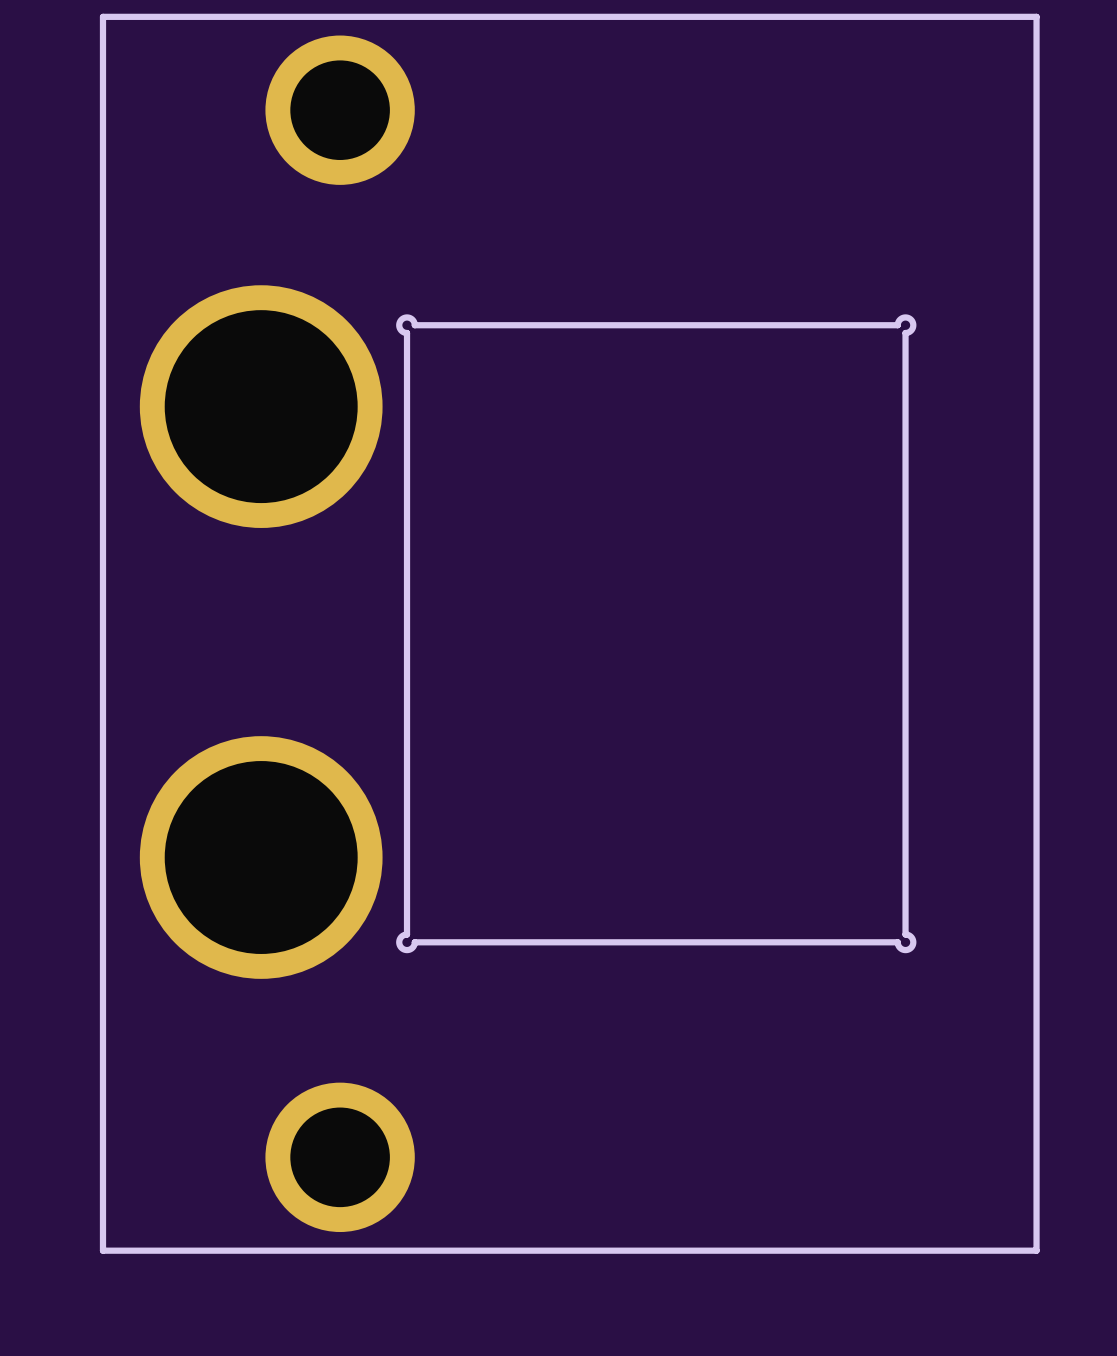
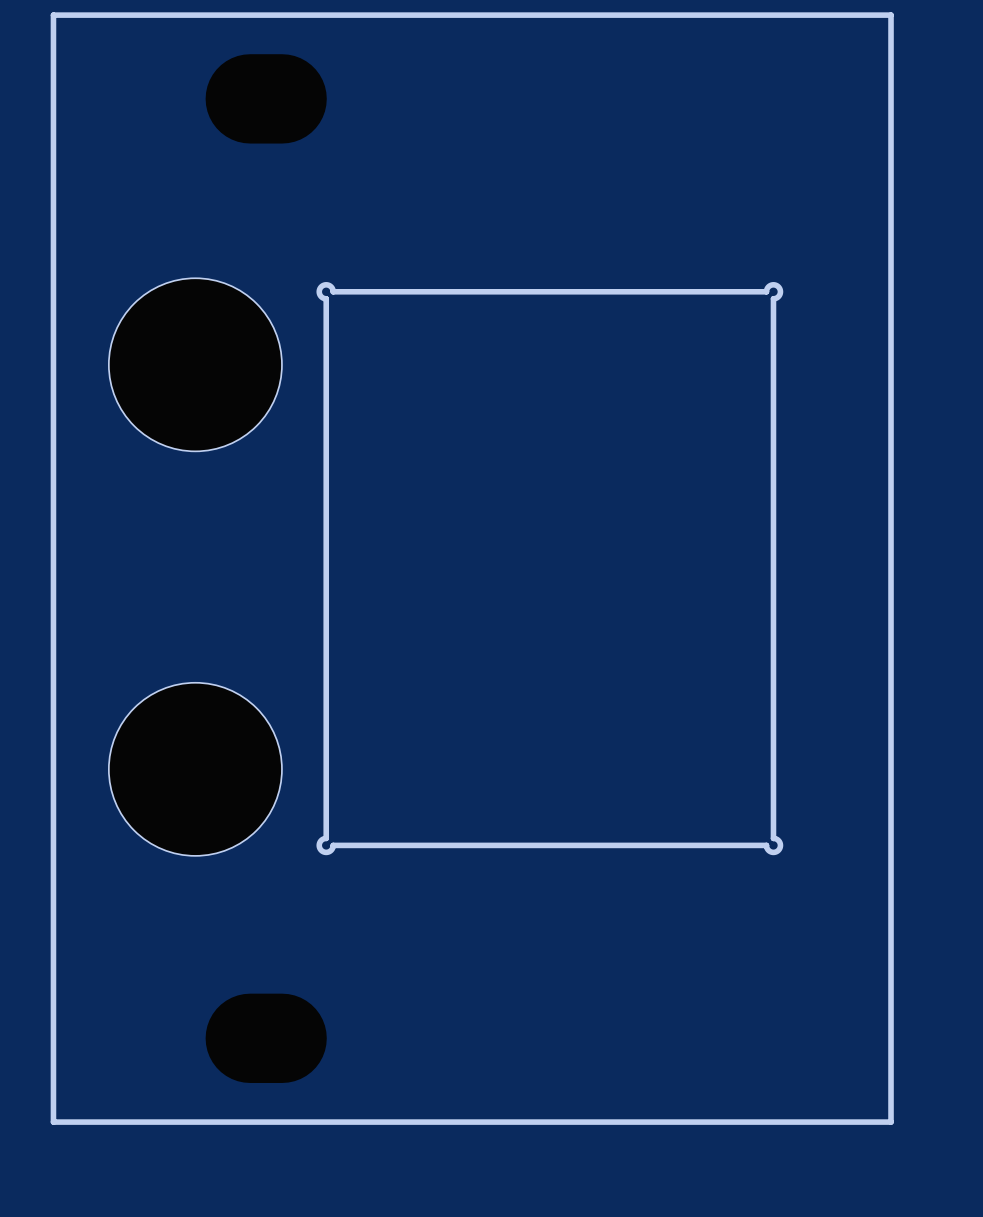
part footprint: [265, 35, 415, 185] -> [205, 54, 327, 144]
part footprint: [139, 285, 383, 528] -> [108, 278, 282, 452]
part footprint: [139, 736, 383, 979] -> [108, 682, 282, 856]
part footprint: [265, 1082, 415, 1233] -> [205, 993, 327, 1083]

